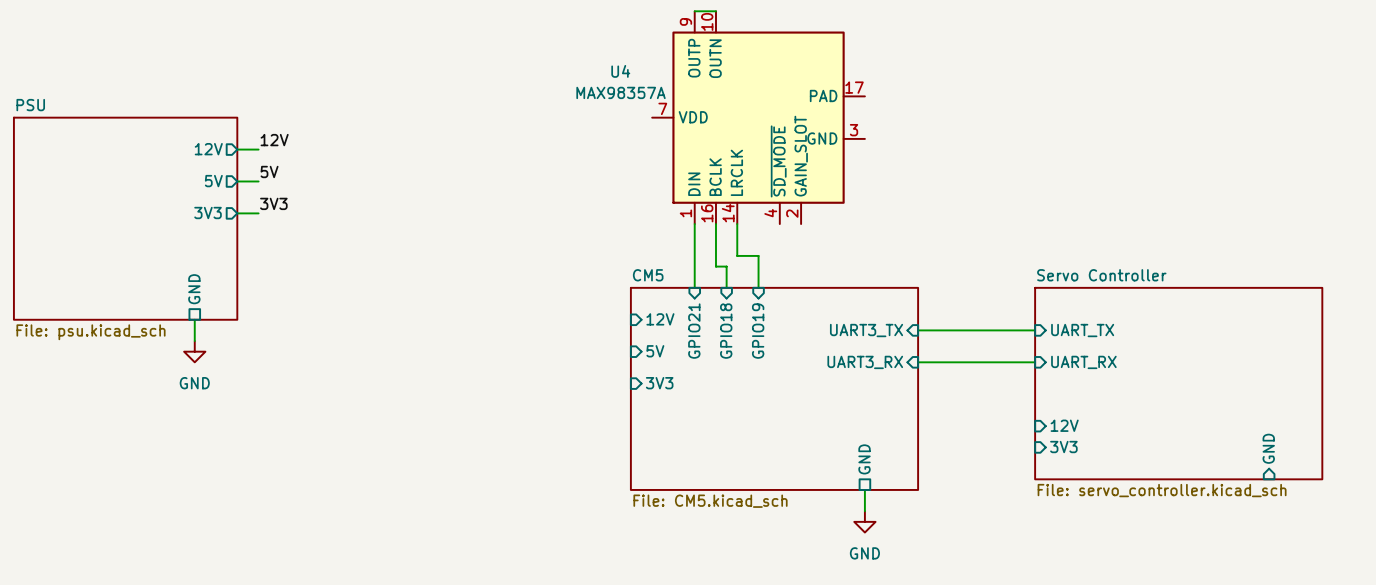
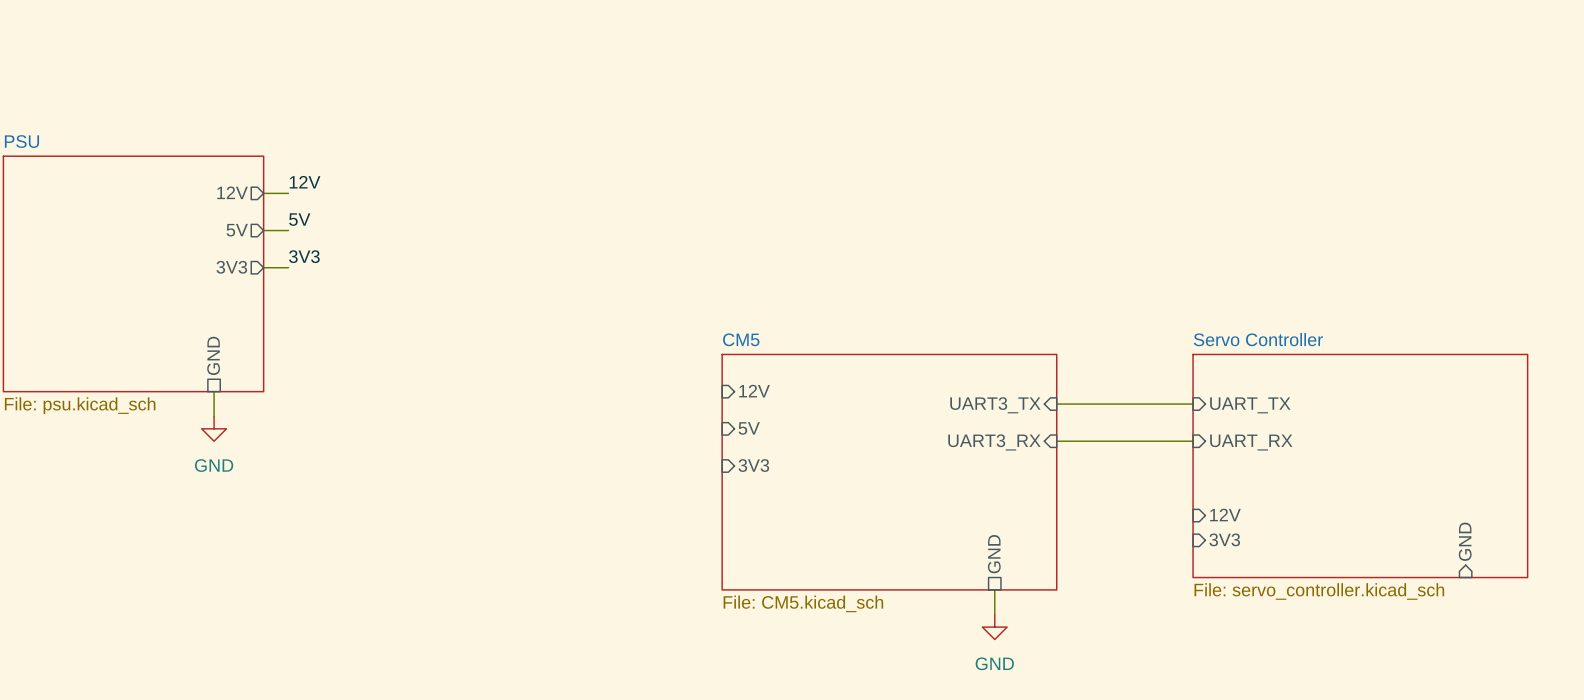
wire: (694, 11) (715, 11) -> none
U4: MAX98357A (758, 117) -> none
wire: (694, 224) (694, 287) -> none
wire: (715, 224) (715, 266) (726, 266) (726, 287) -> none
wire: (737, 224) (737, 255) (758, 255) (758, 287) -> none
sheet pin: GPIO21 (694, 331) -> none
sheet pin: GPIO18 (726, 331) -> none
sheet pin: GPIO19 (758, 331) -> none

